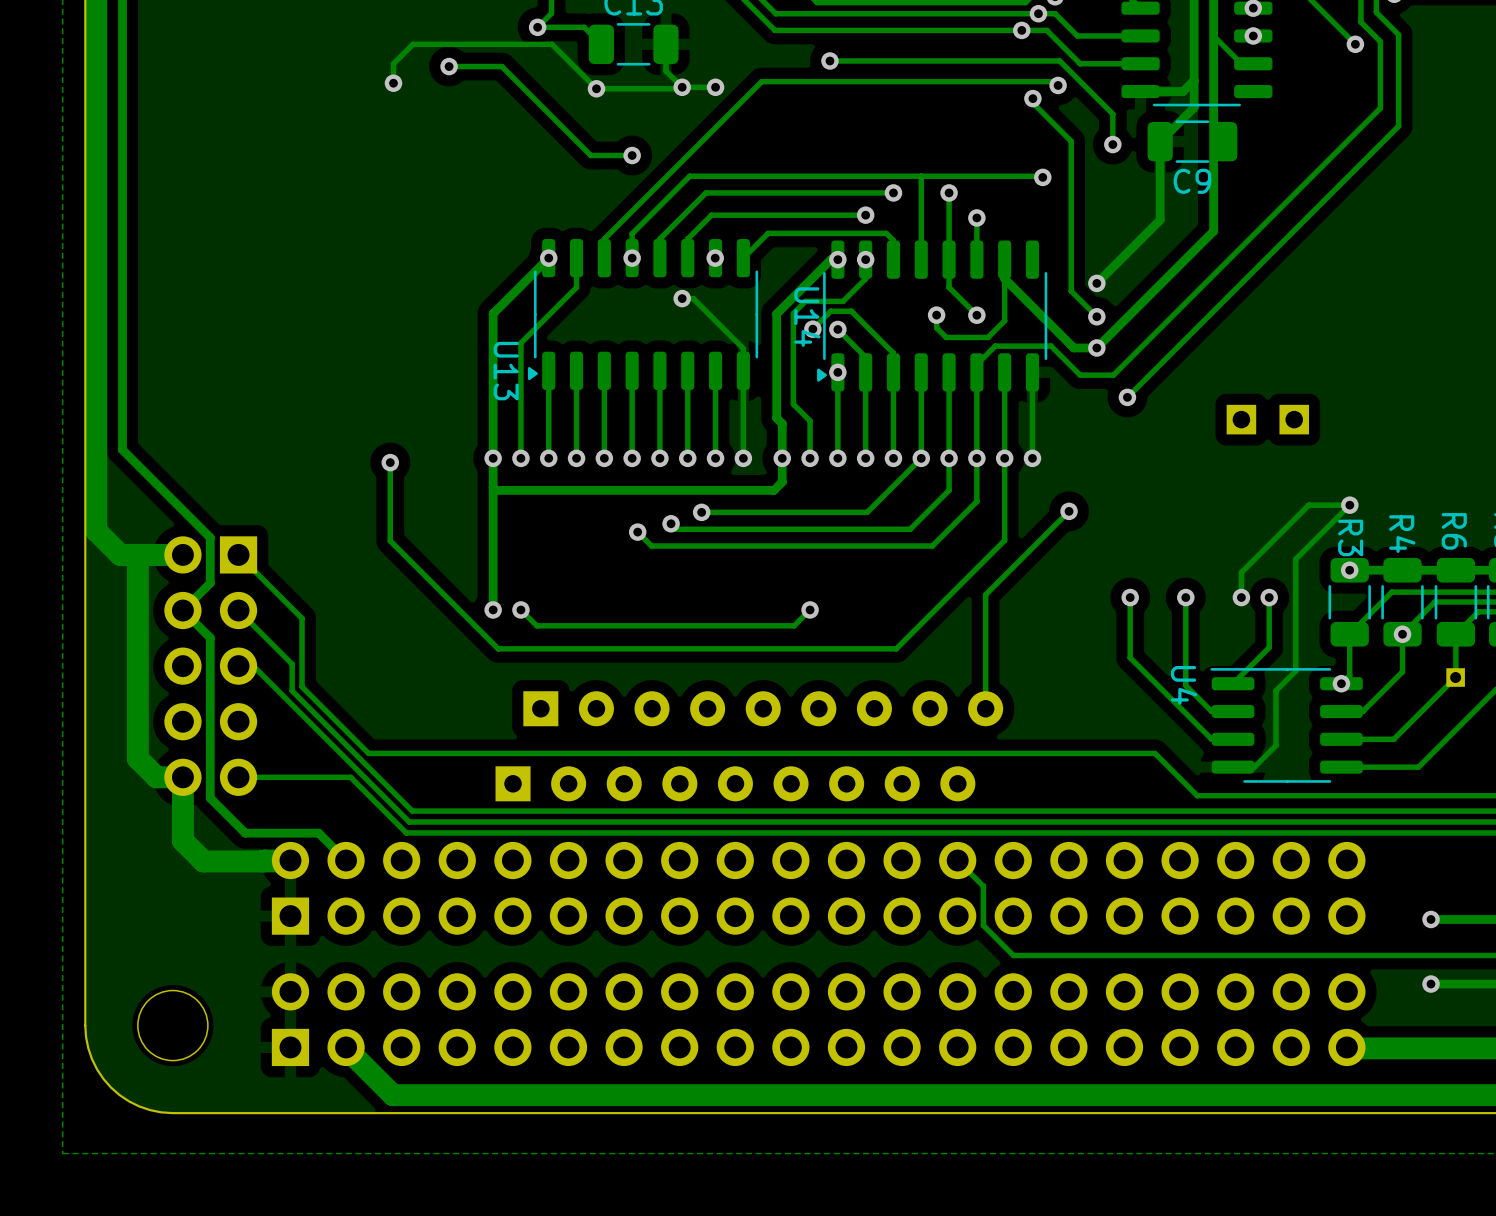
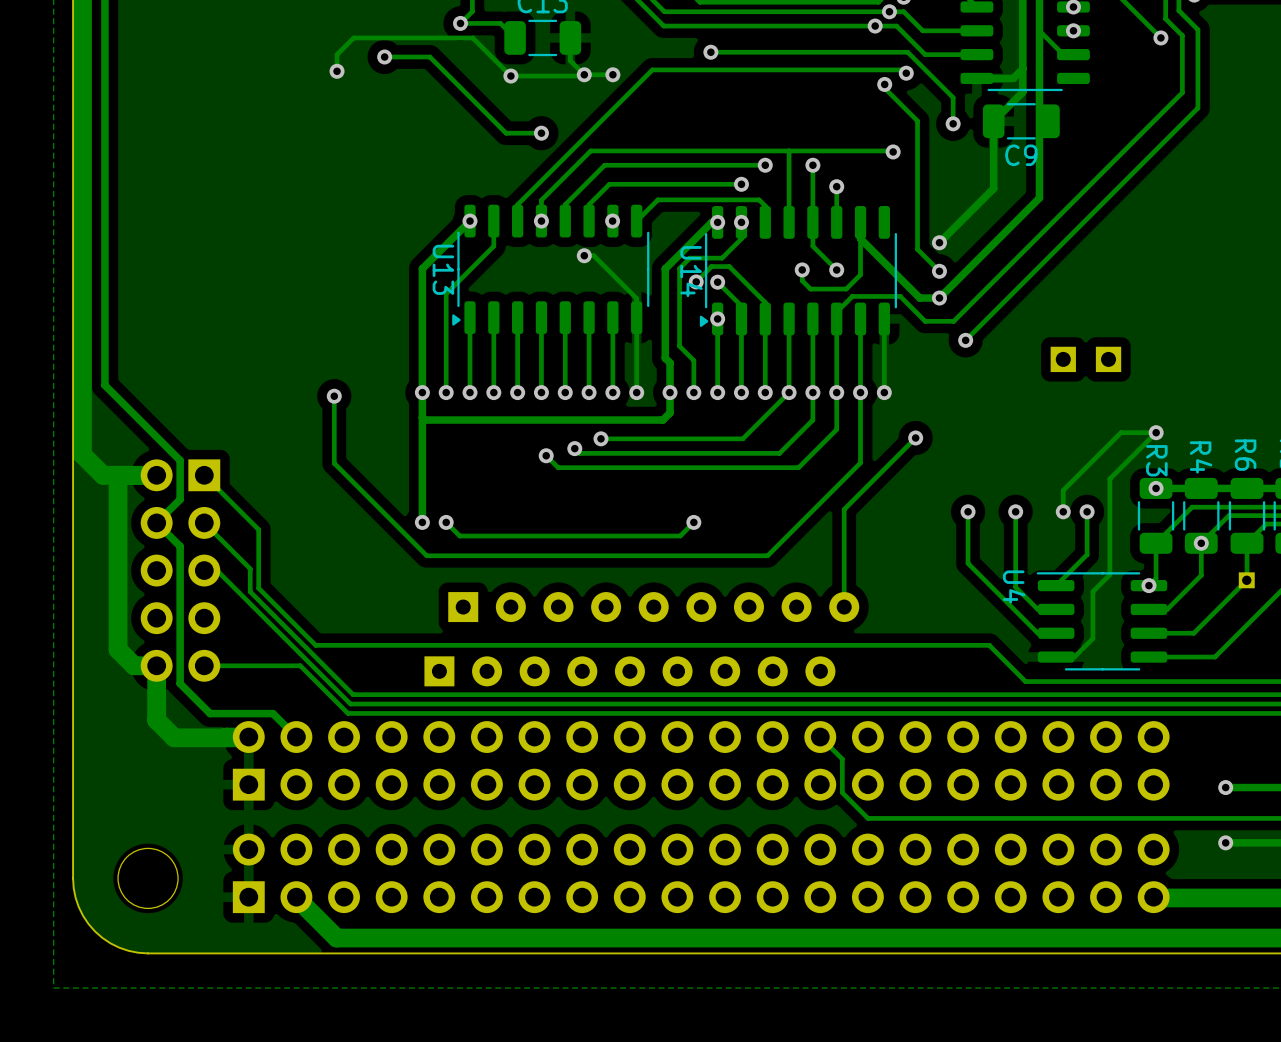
U13 name position: U13 (506, 371) -> U13 (443, 269)

